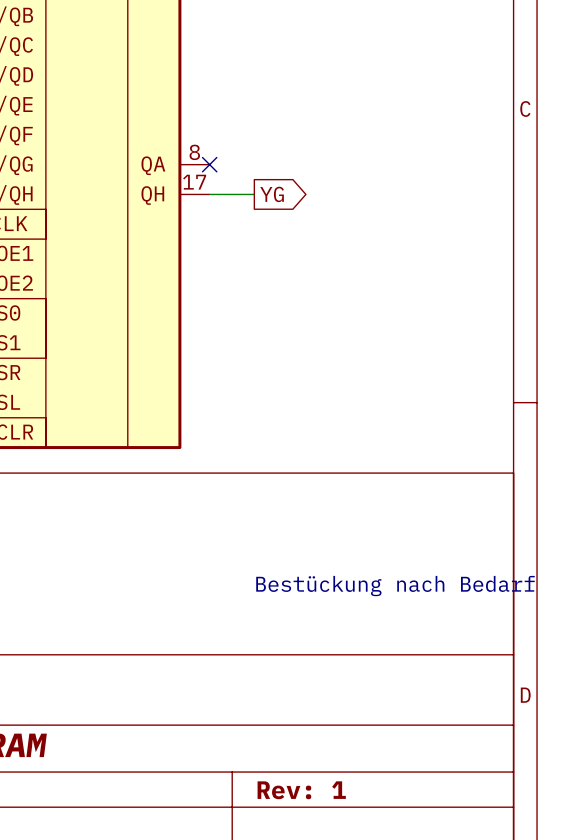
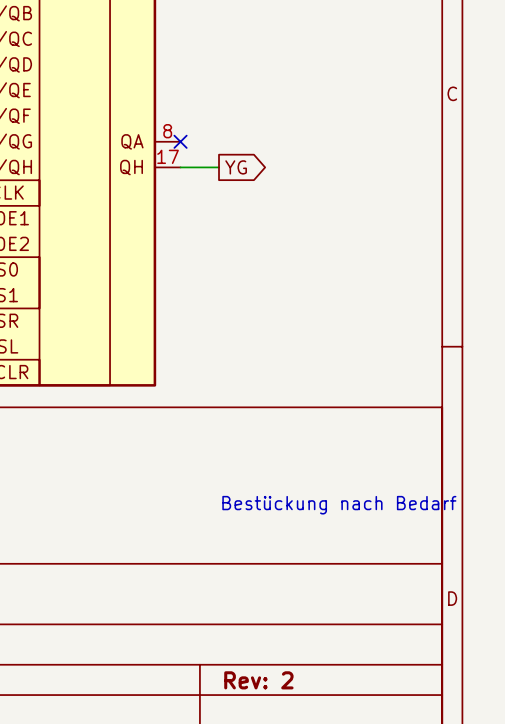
title block: Rev: 1 (301, 790) -> Rev: 2 (258, 680)

